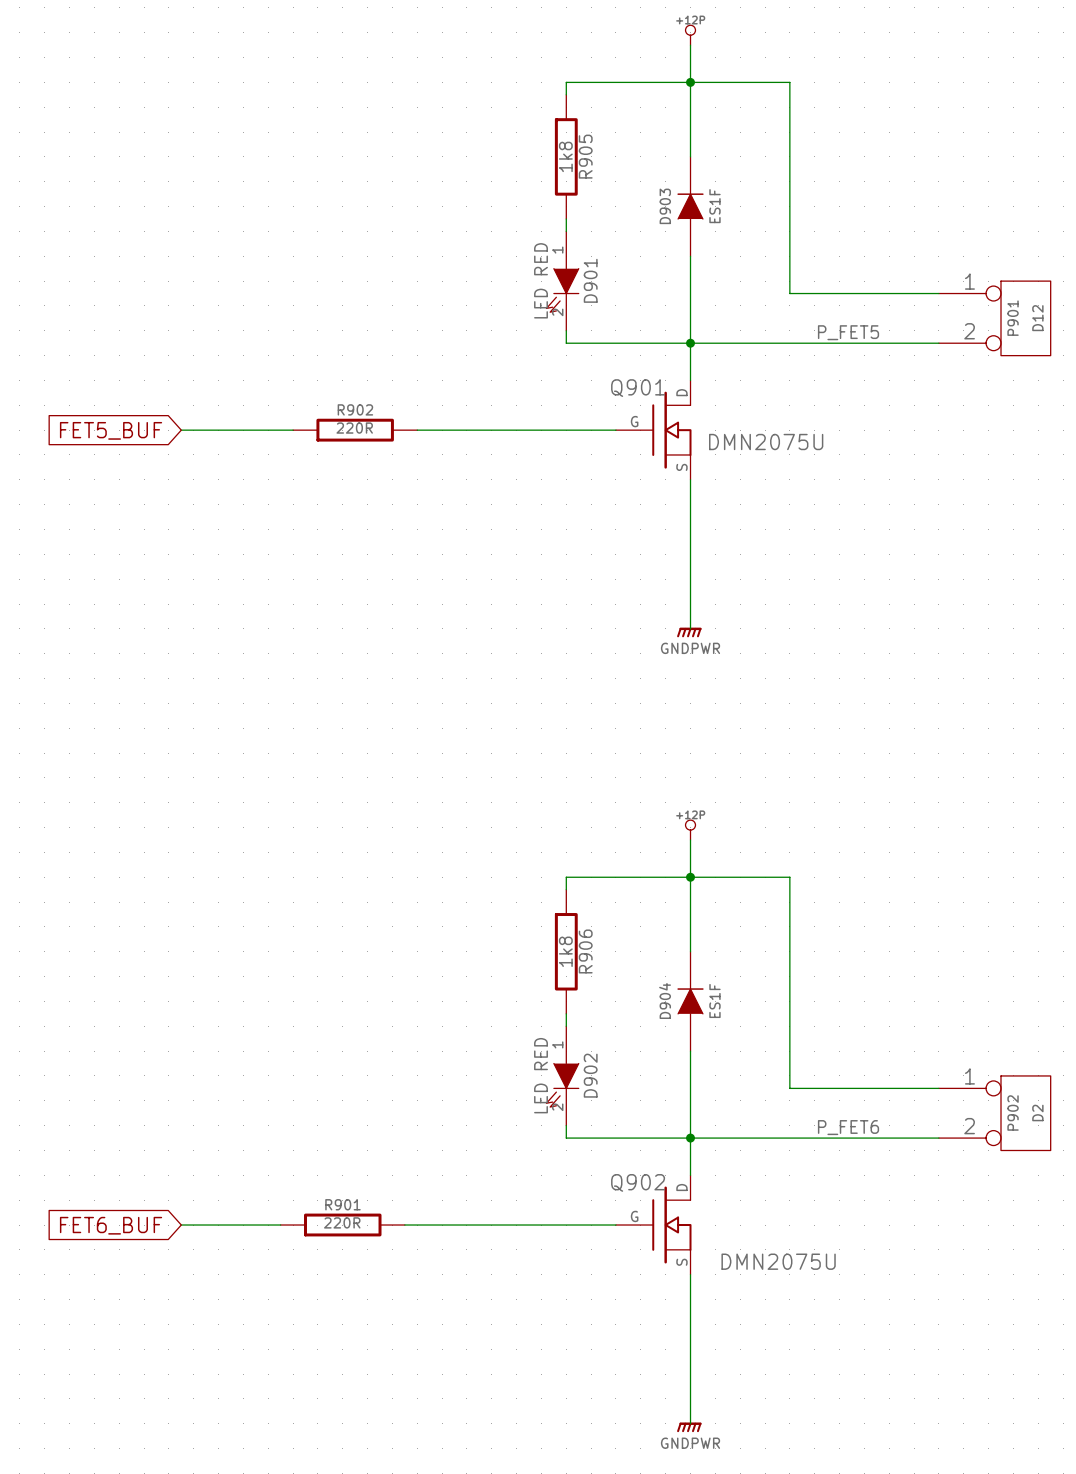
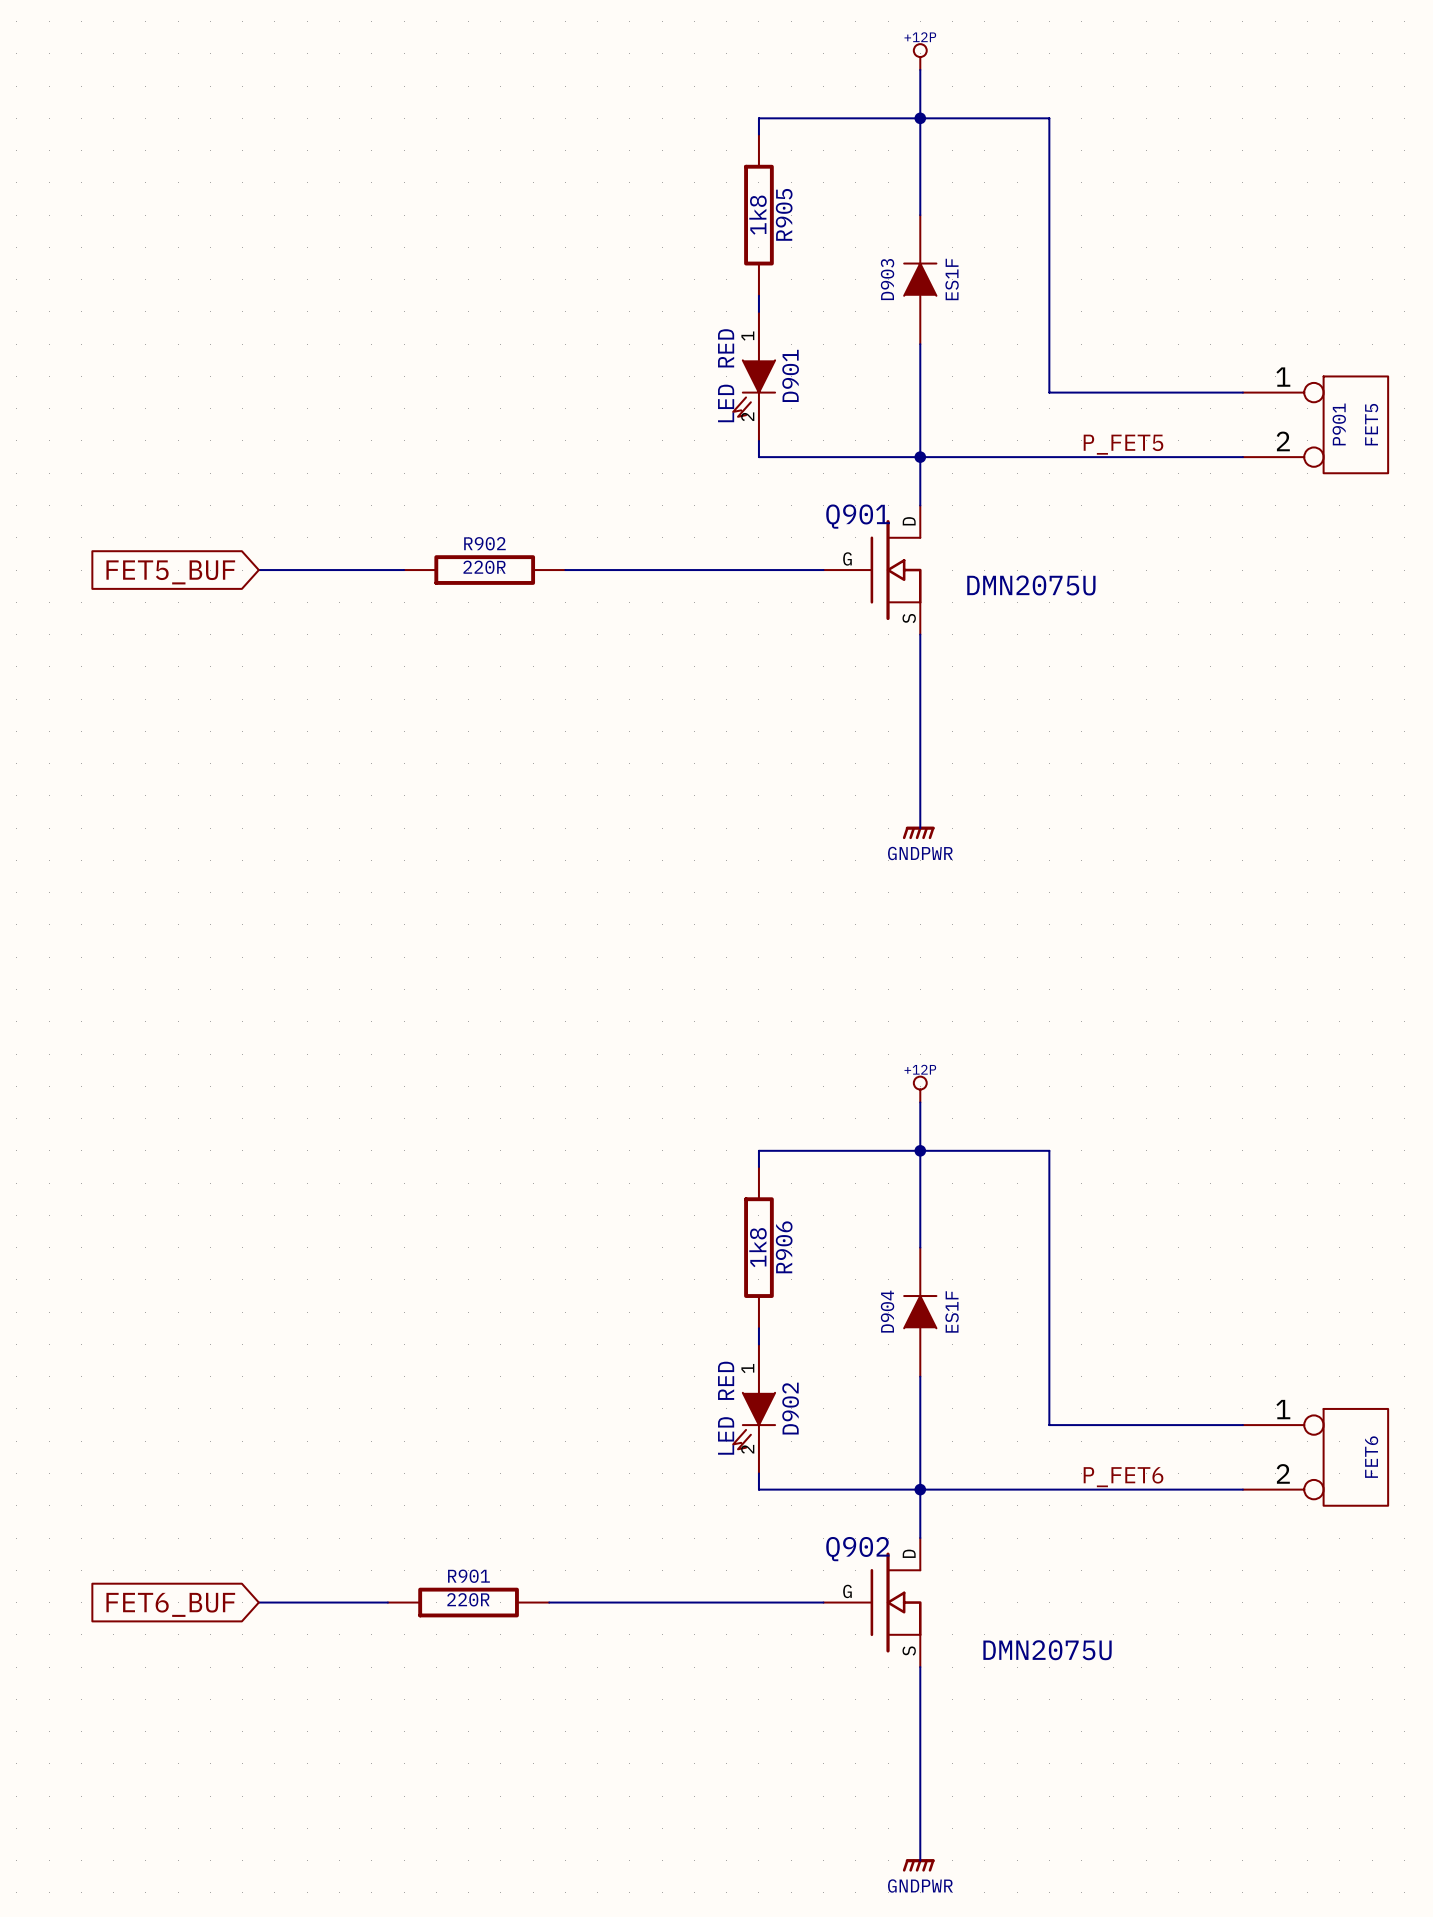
P901 value: D12 (1037, 318) -> FET5 (1371, 424)
P902 name: P902 (1013, 1112) -> none
P902 value: D2 (1037, 1112) -> FET6 (1371, 1457)

